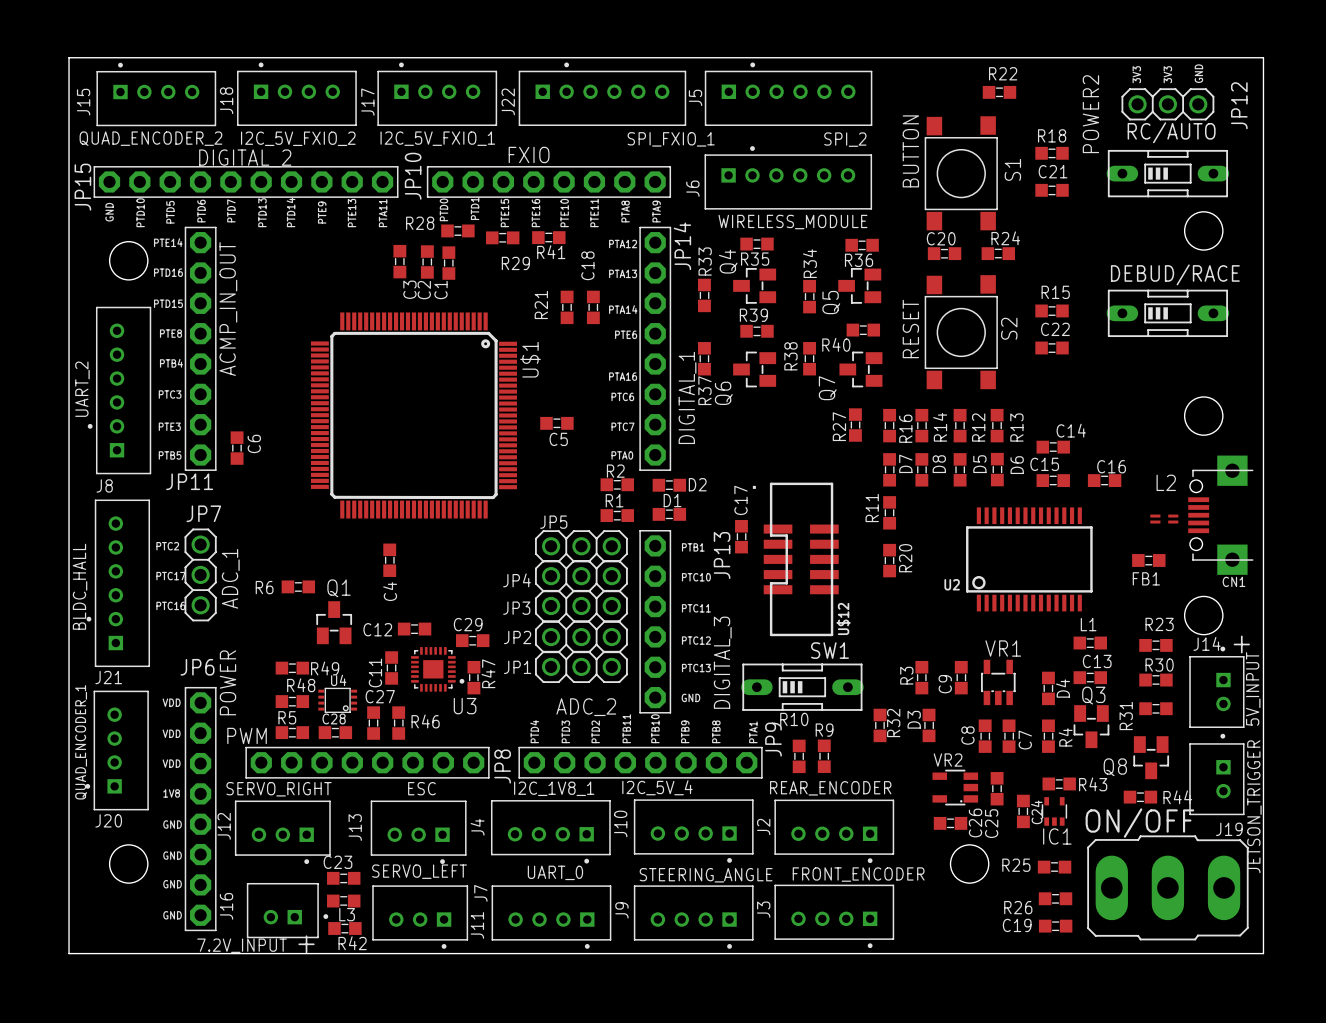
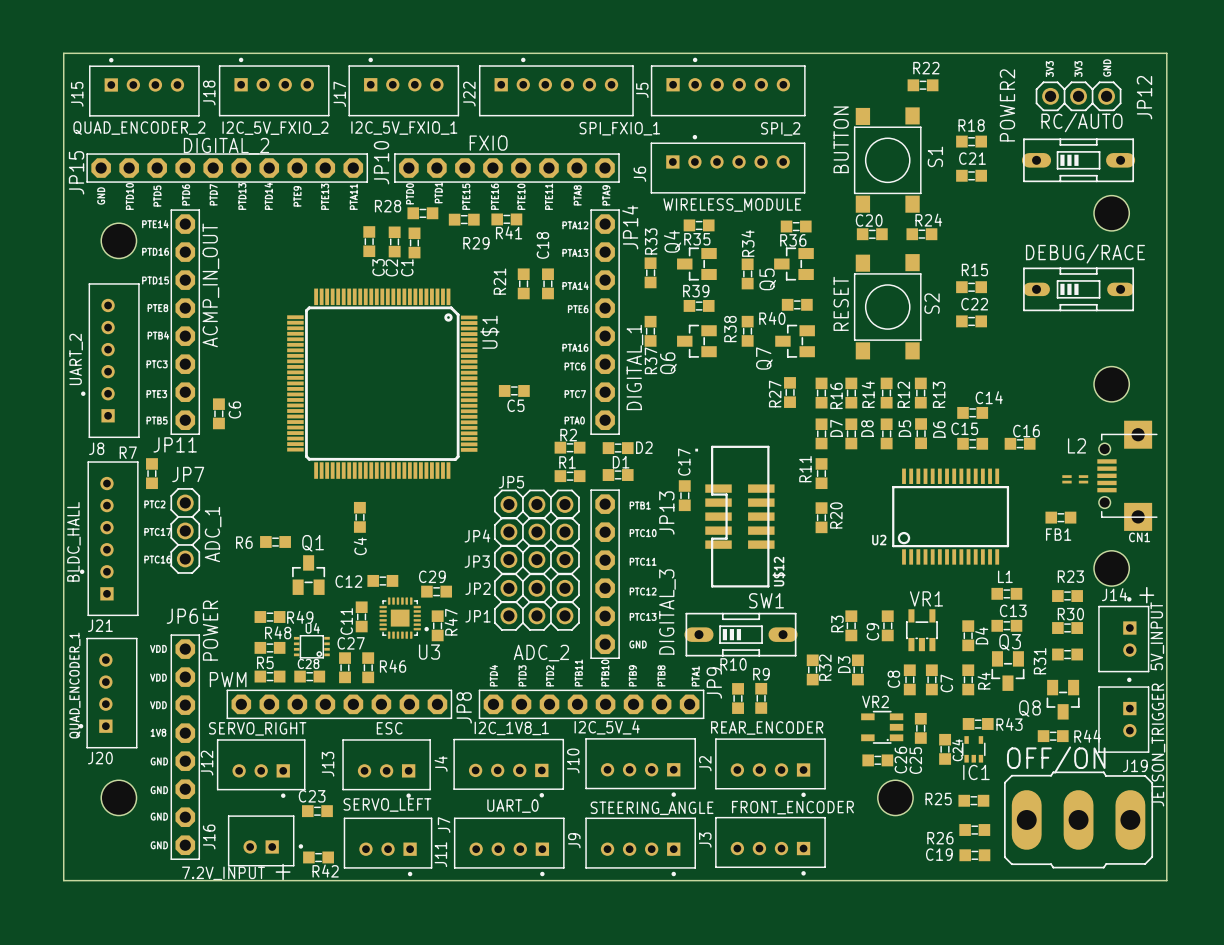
DEBUD/RACE: (1167, 313) -> none
DEBUG/RACE: none -> (1078, 289)
R7: none -> (151, 473)
part value: ON/OFF (1139, 823) -> OFF/ON (1056, 760)
L3: (343, 901) -> none

